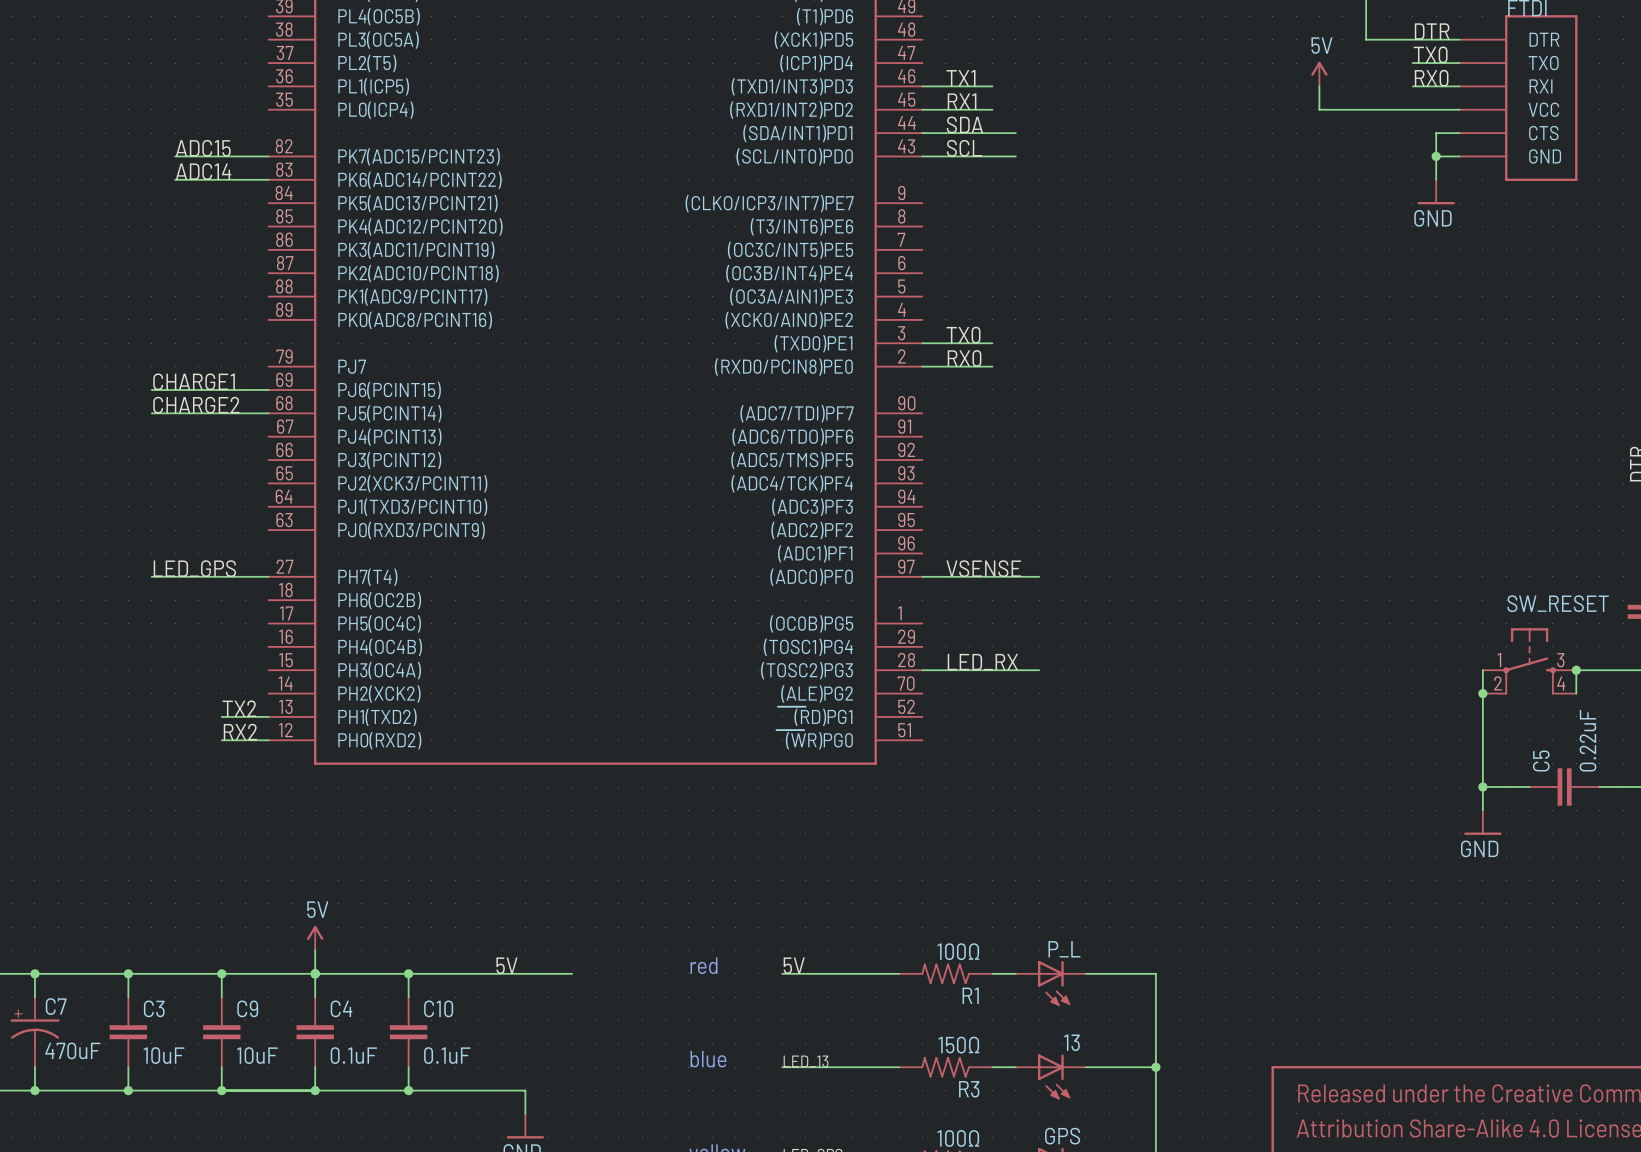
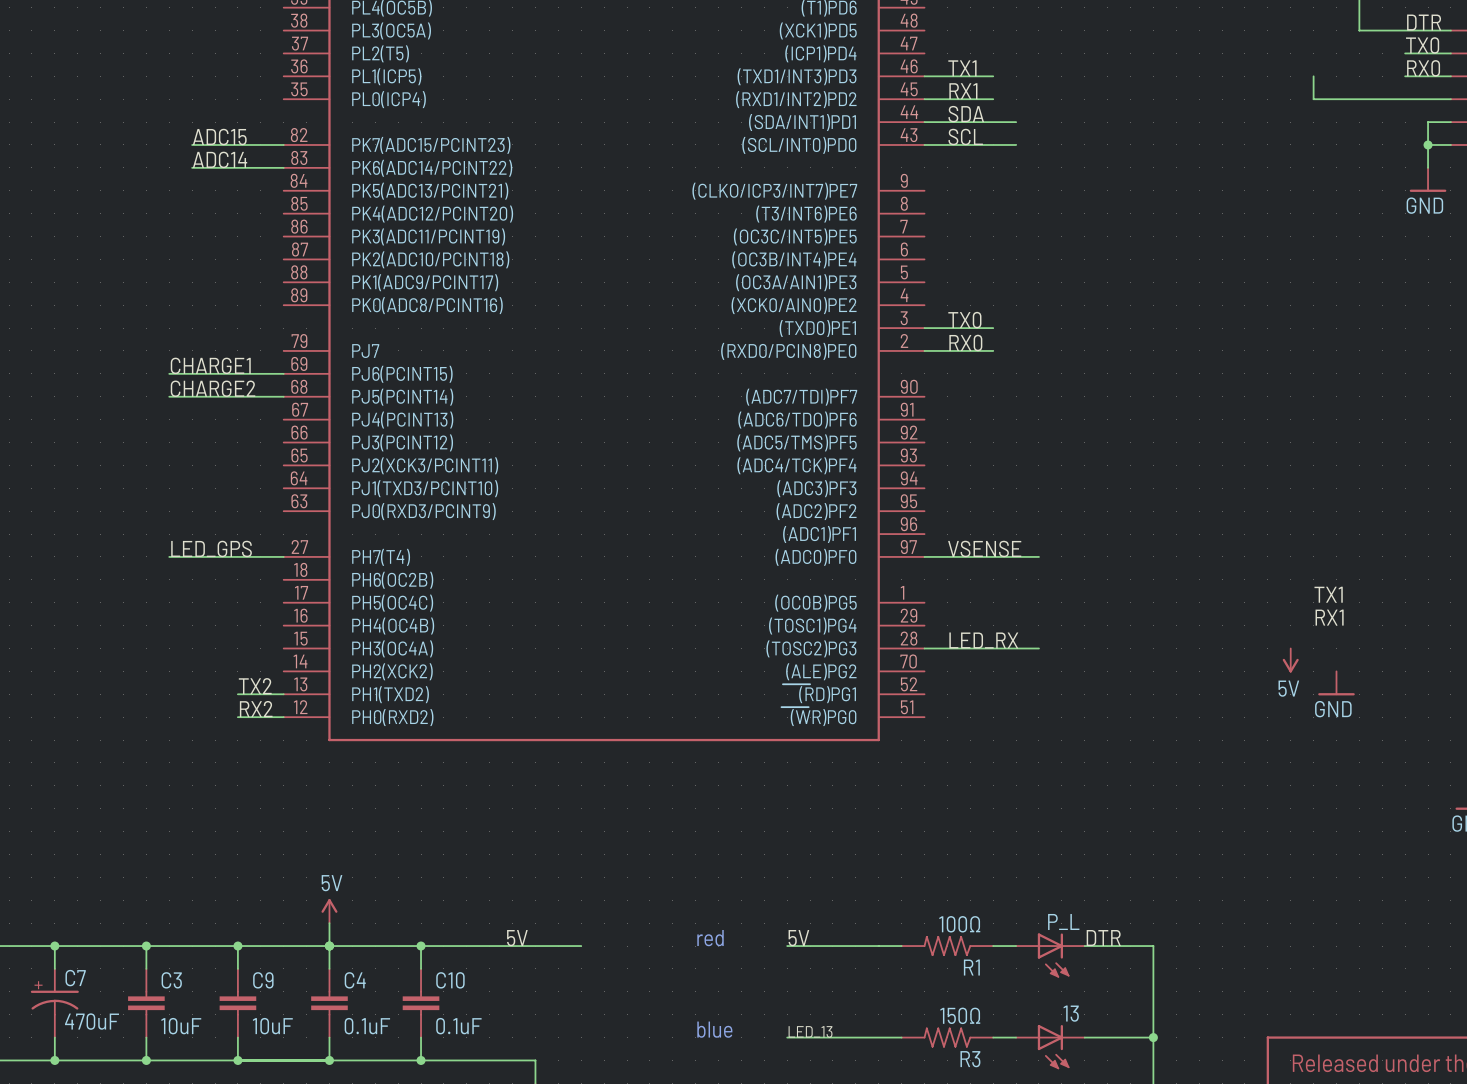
power symbol: 5V (1319, 74) -> none
label: none -> TX1 (1328, 594)
label: none -> RX1 (1329, 617)
power symbol: none -> 5V (1290, 660)
power symbol: none -> GND (1336, 683)
label: none -> DTR (1103, 938)

